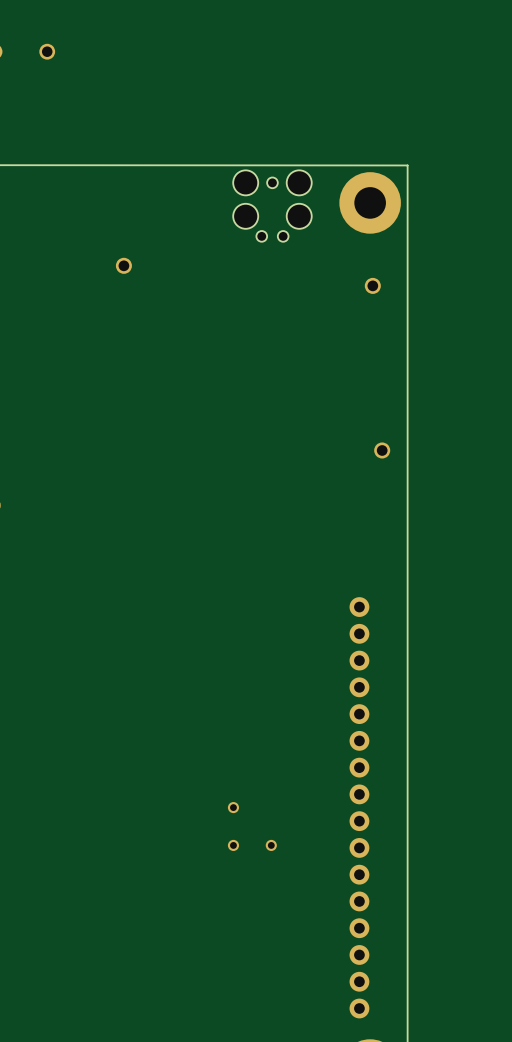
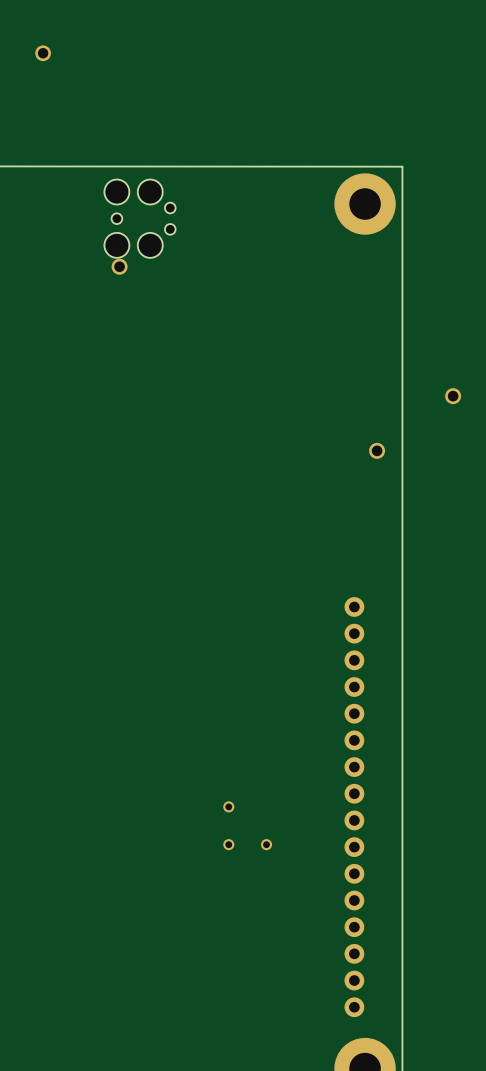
part rotation: 0° (272, 206) -> 90° counterclockwise (140, 218)
part position: (272, 206) -> (140, 218)
part position: (372, 285) -> (453, 396)

